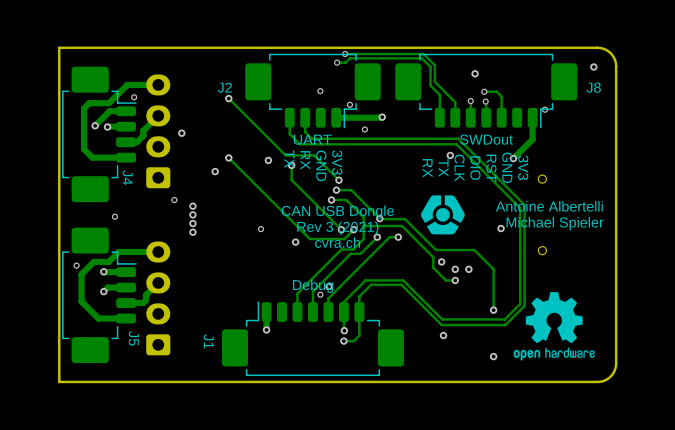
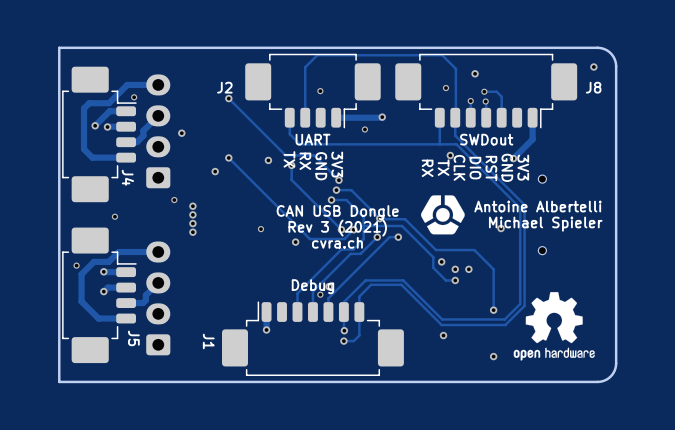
track: (345, 54) (423, 54) (434, 65) (434, 81) (455, 102) (455, 117) -> none
via: (345, 54) -> none
track: (337, 62) (345, 62) (349, 58) (421, 58) (430, 67) (430, 85) (439, 94) (439, 117) -> (439, 144) (439, 117)
via: (337, 62) -> none
via: none -> (445, 88)
via: (349, 104) -> none
via: (544, 109) -> none
track: (305, 117) (305, 132) (311, 138) (458, 138) -> (305, 117) (305, 67) (317, 55) (442, 55) (455, 68) (455, 135) (458, 138)

